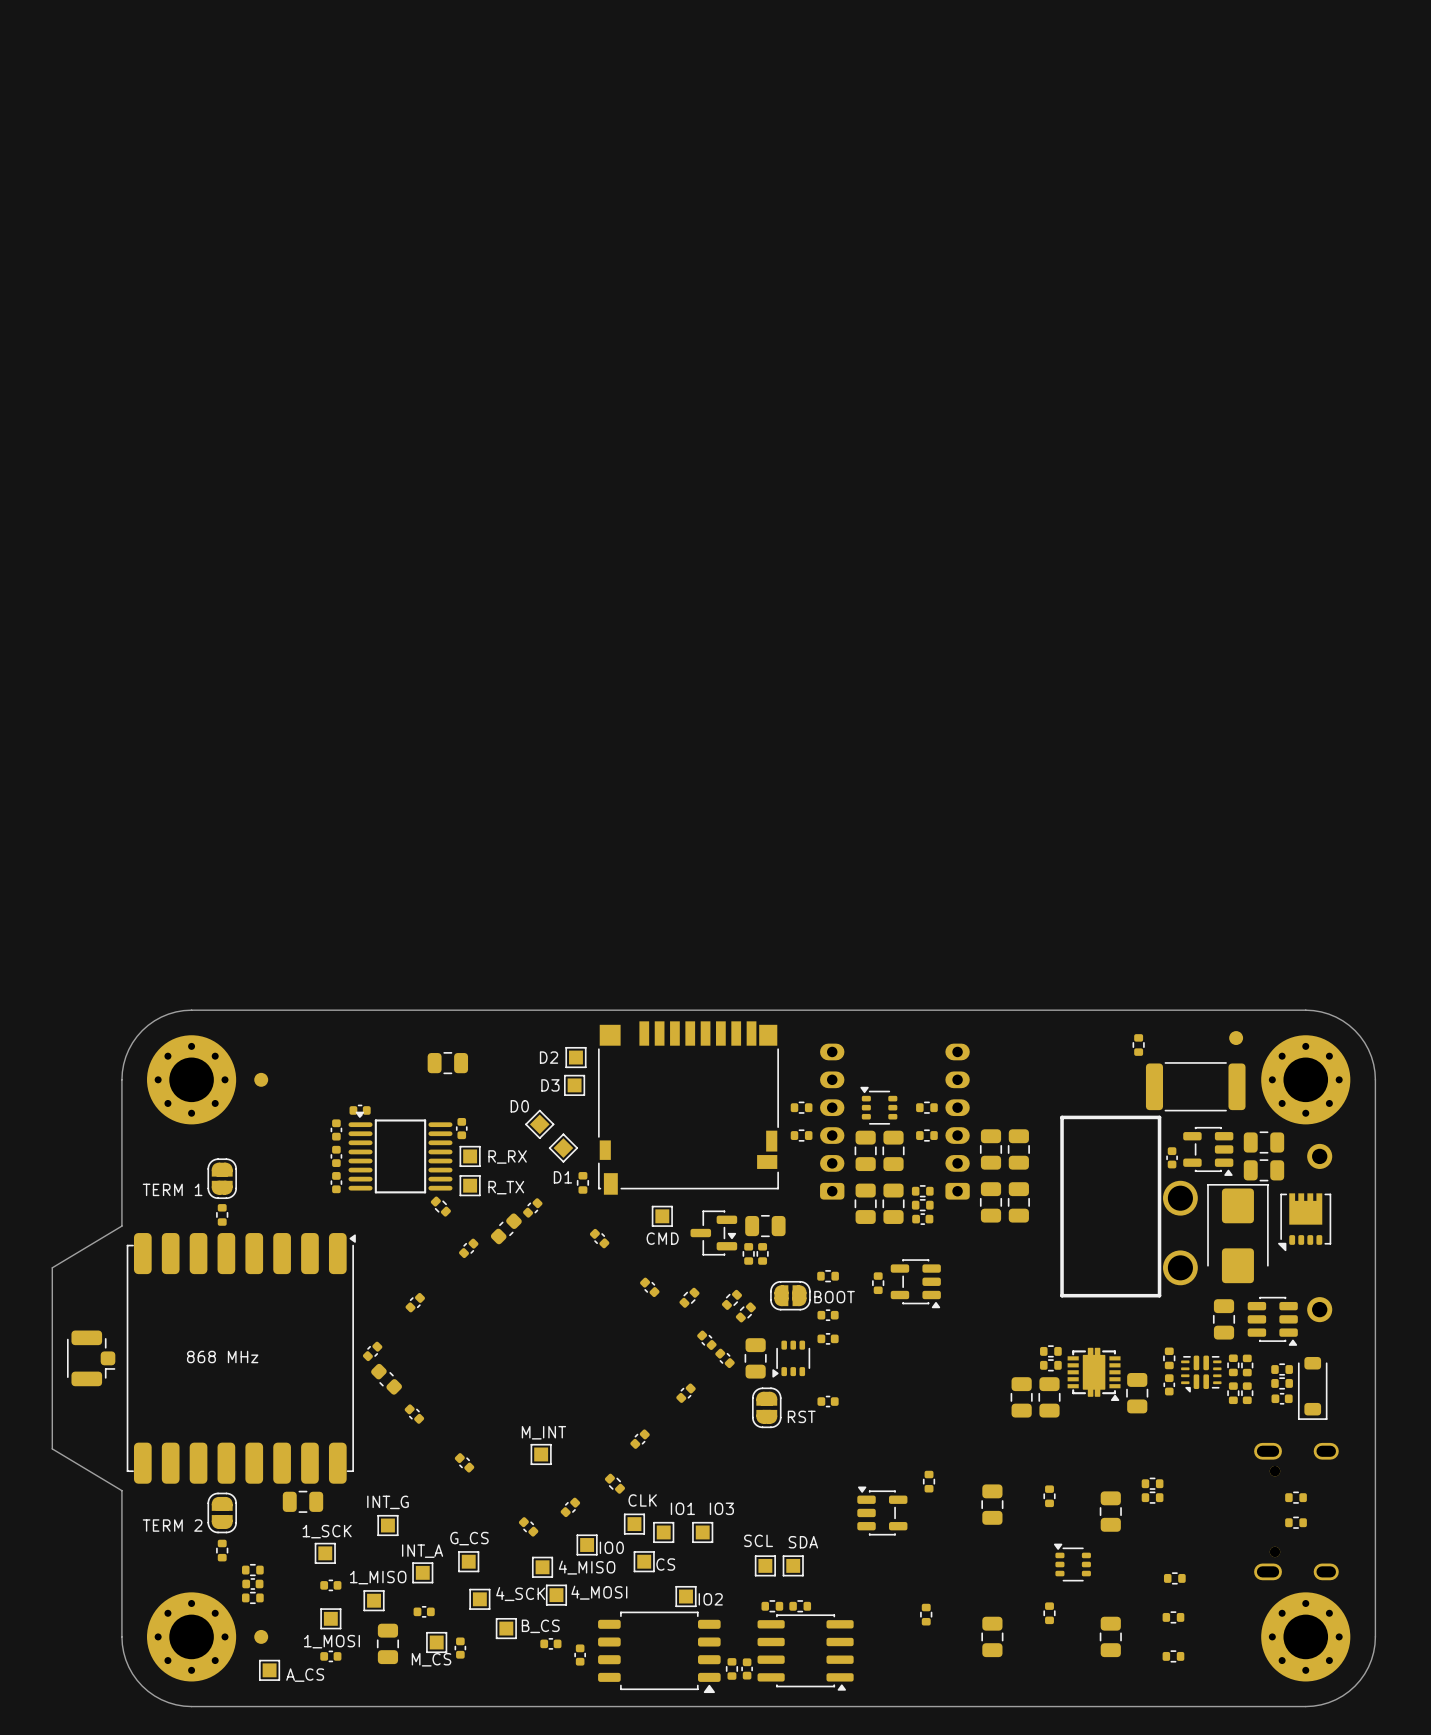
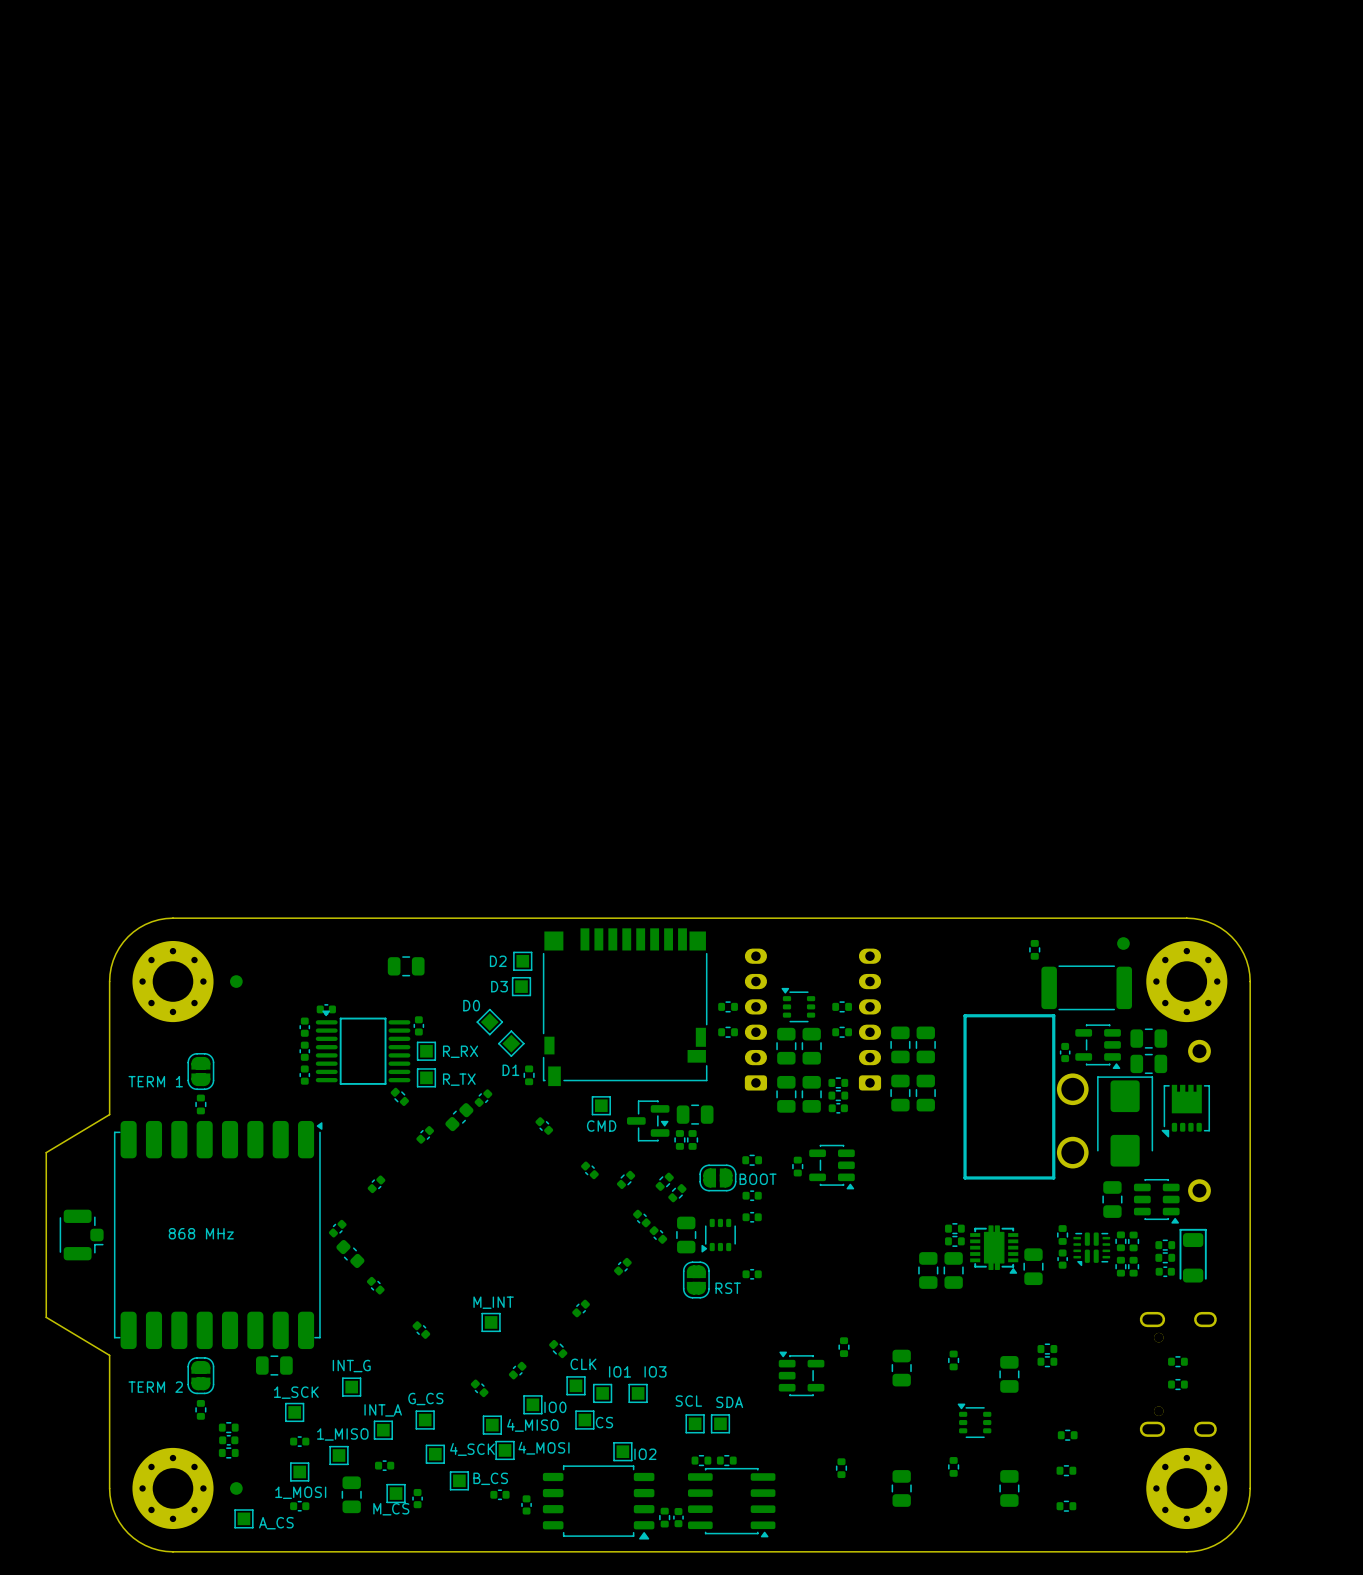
part footprint: [1297, 1356, 1328, 1420] -> [1179, 1228, 1207, 1283]

